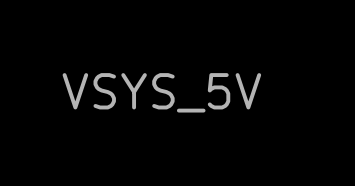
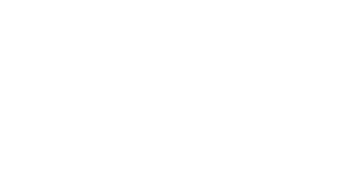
label: VSYS_5V (161, 92) -> none

